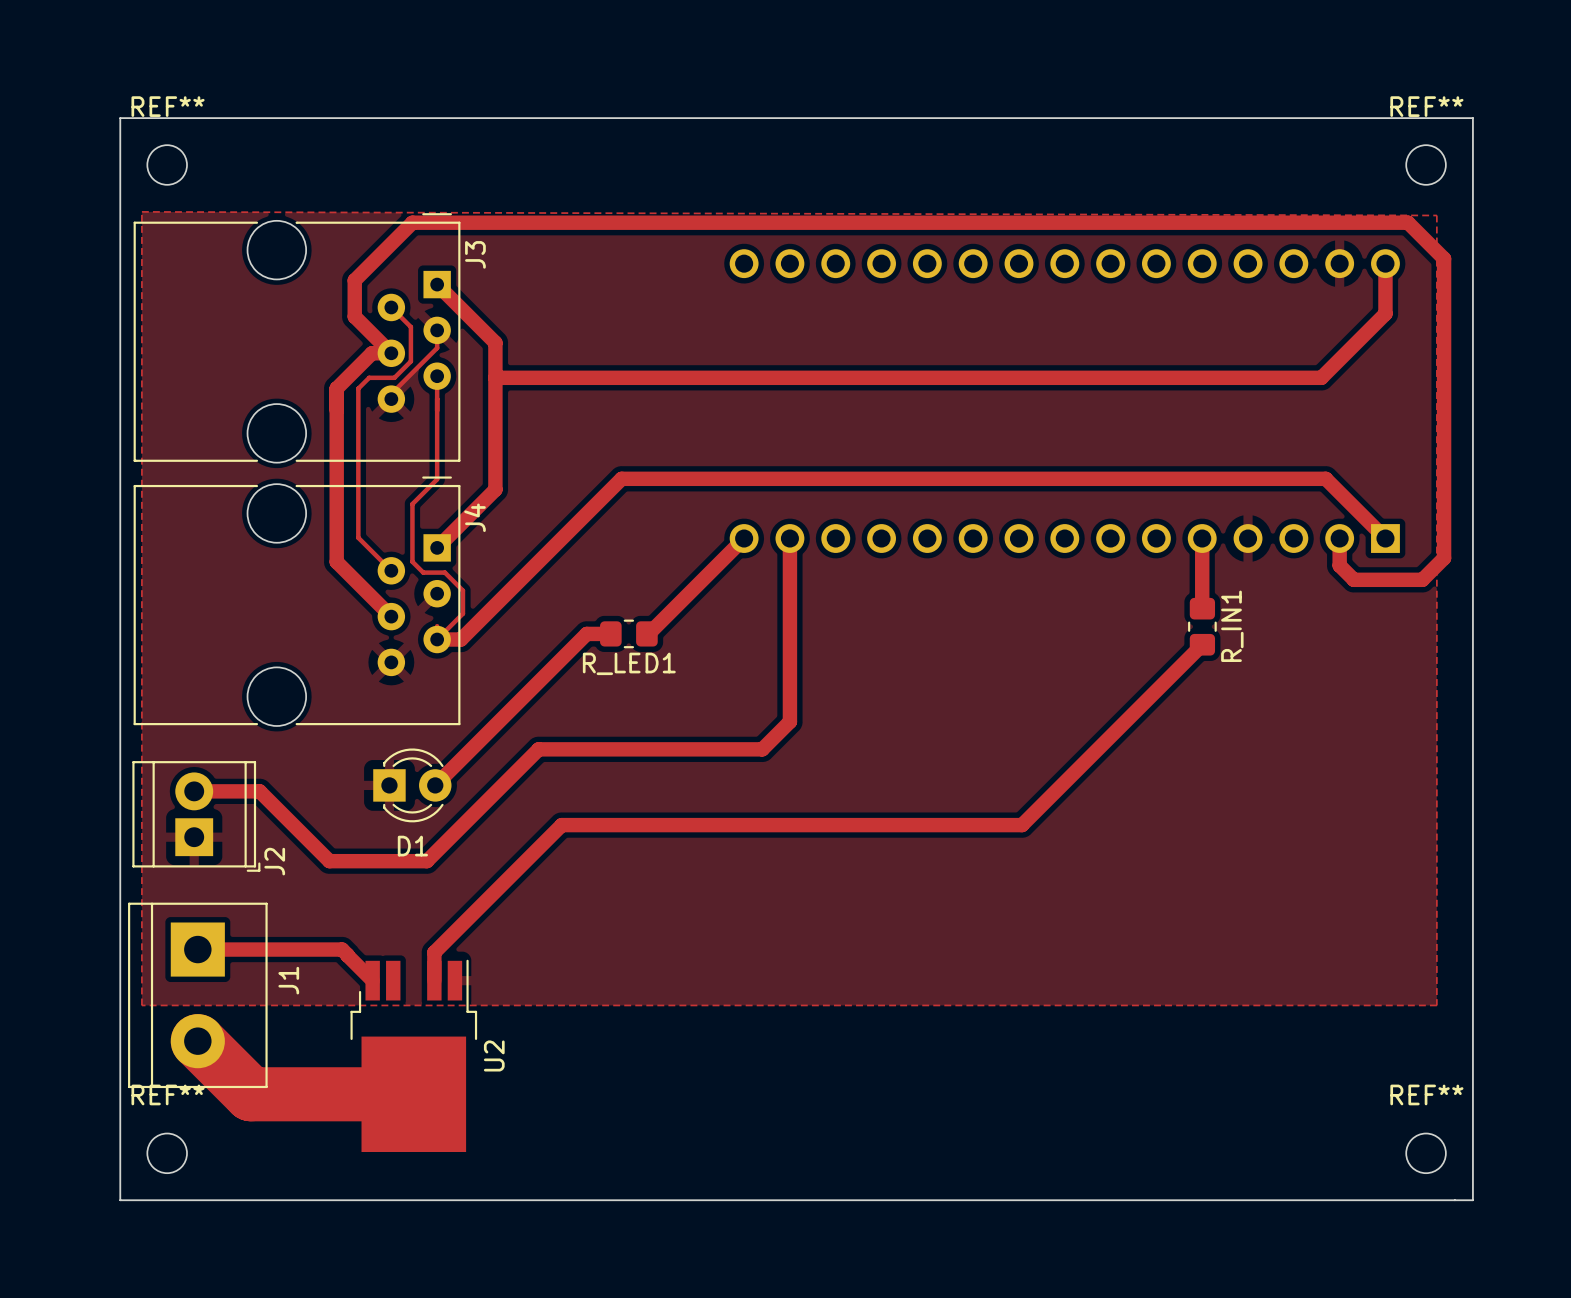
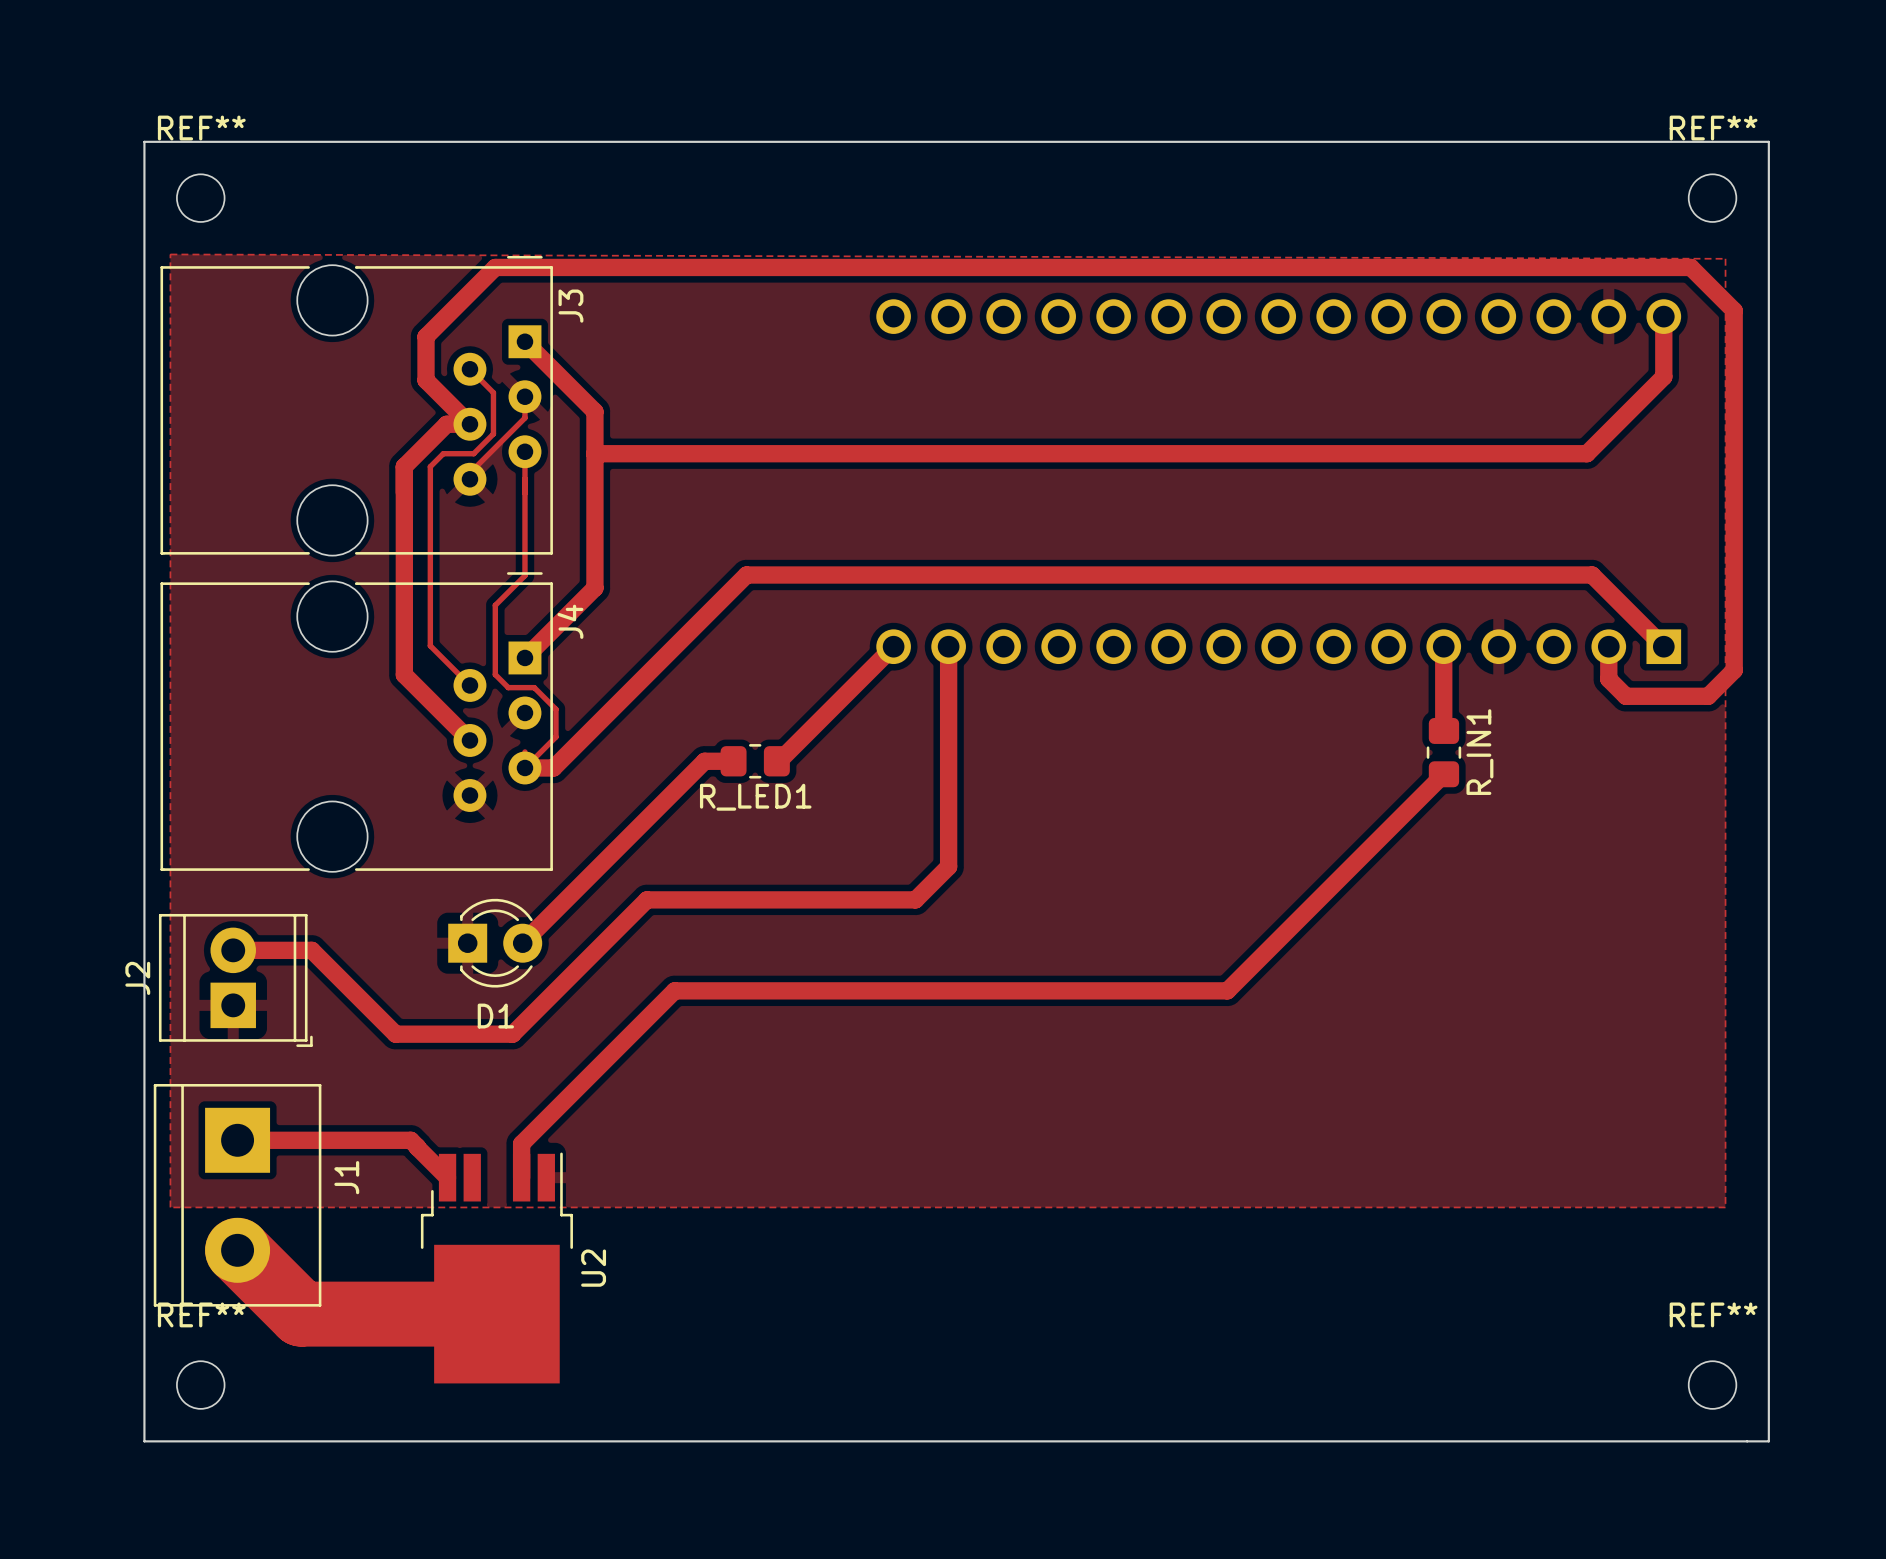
J2 name position: J2 (274, 861) -> J2 (137, 978)

